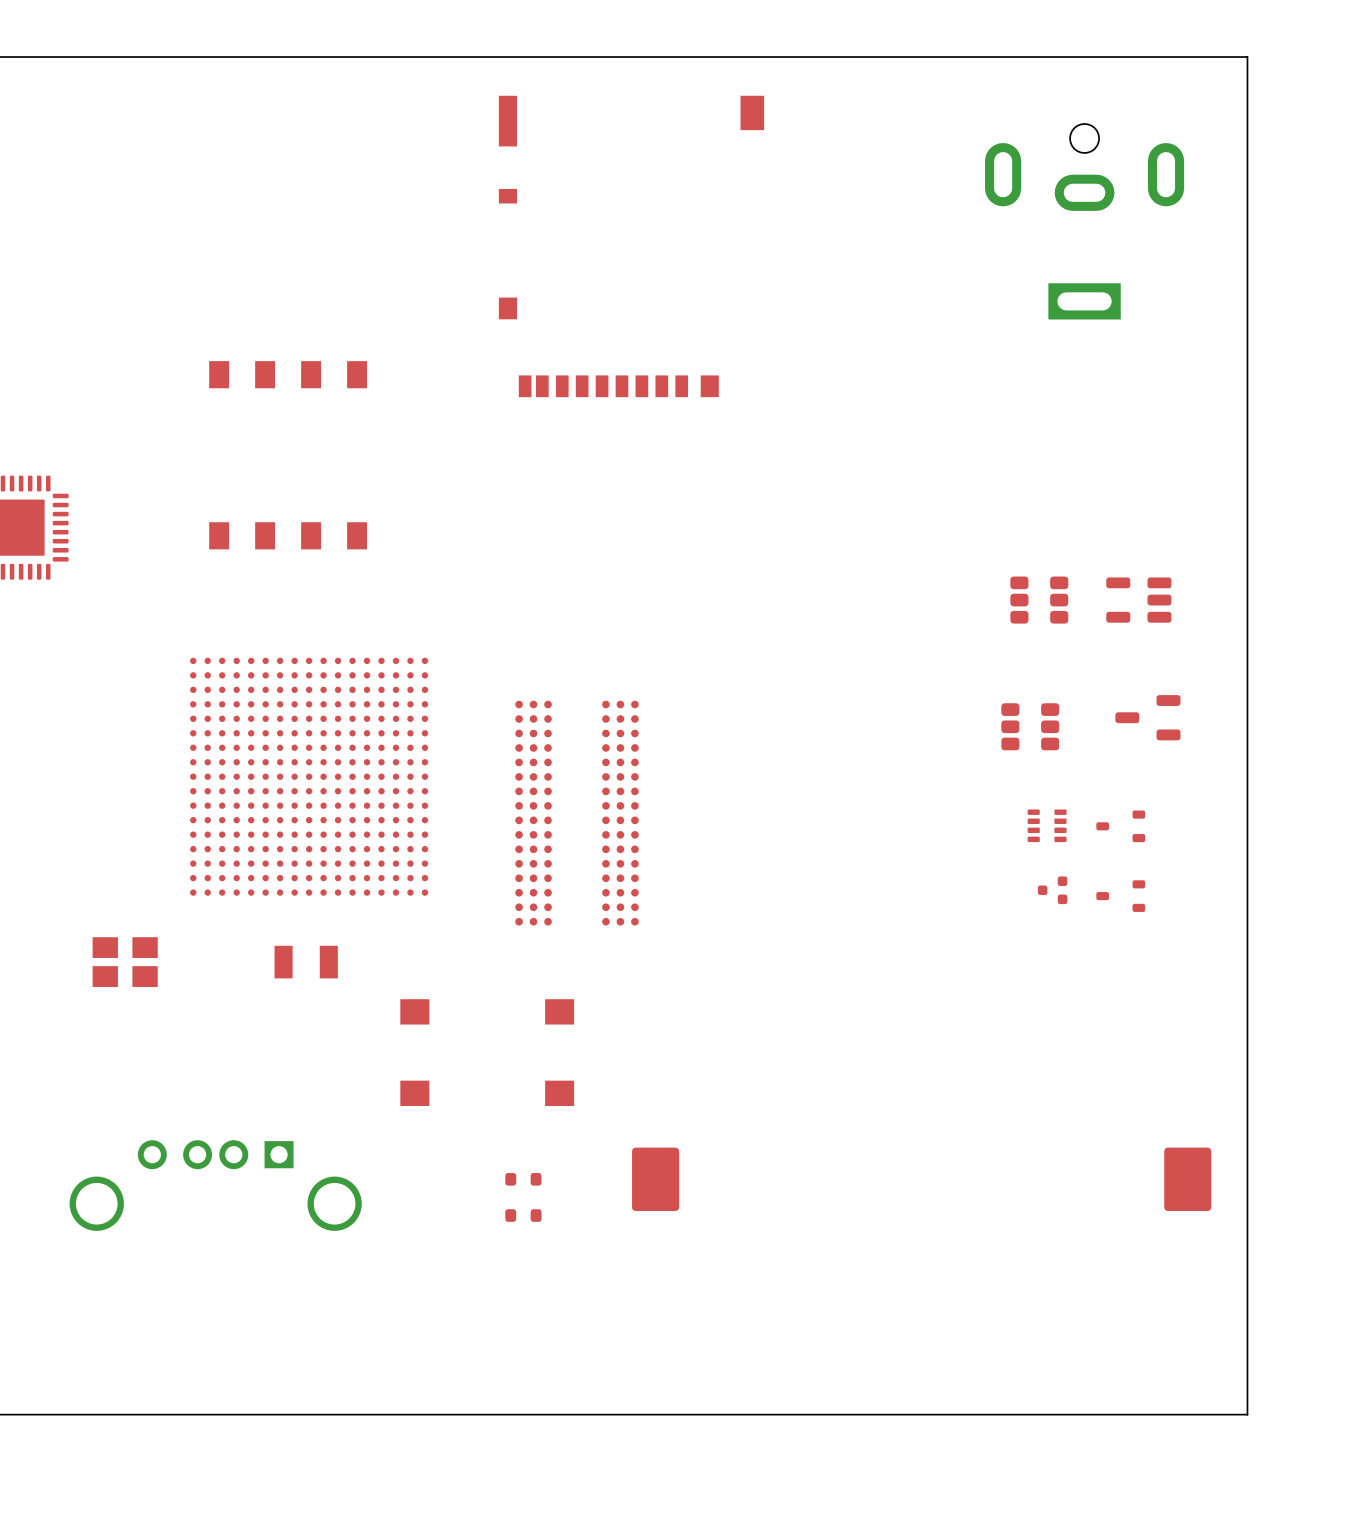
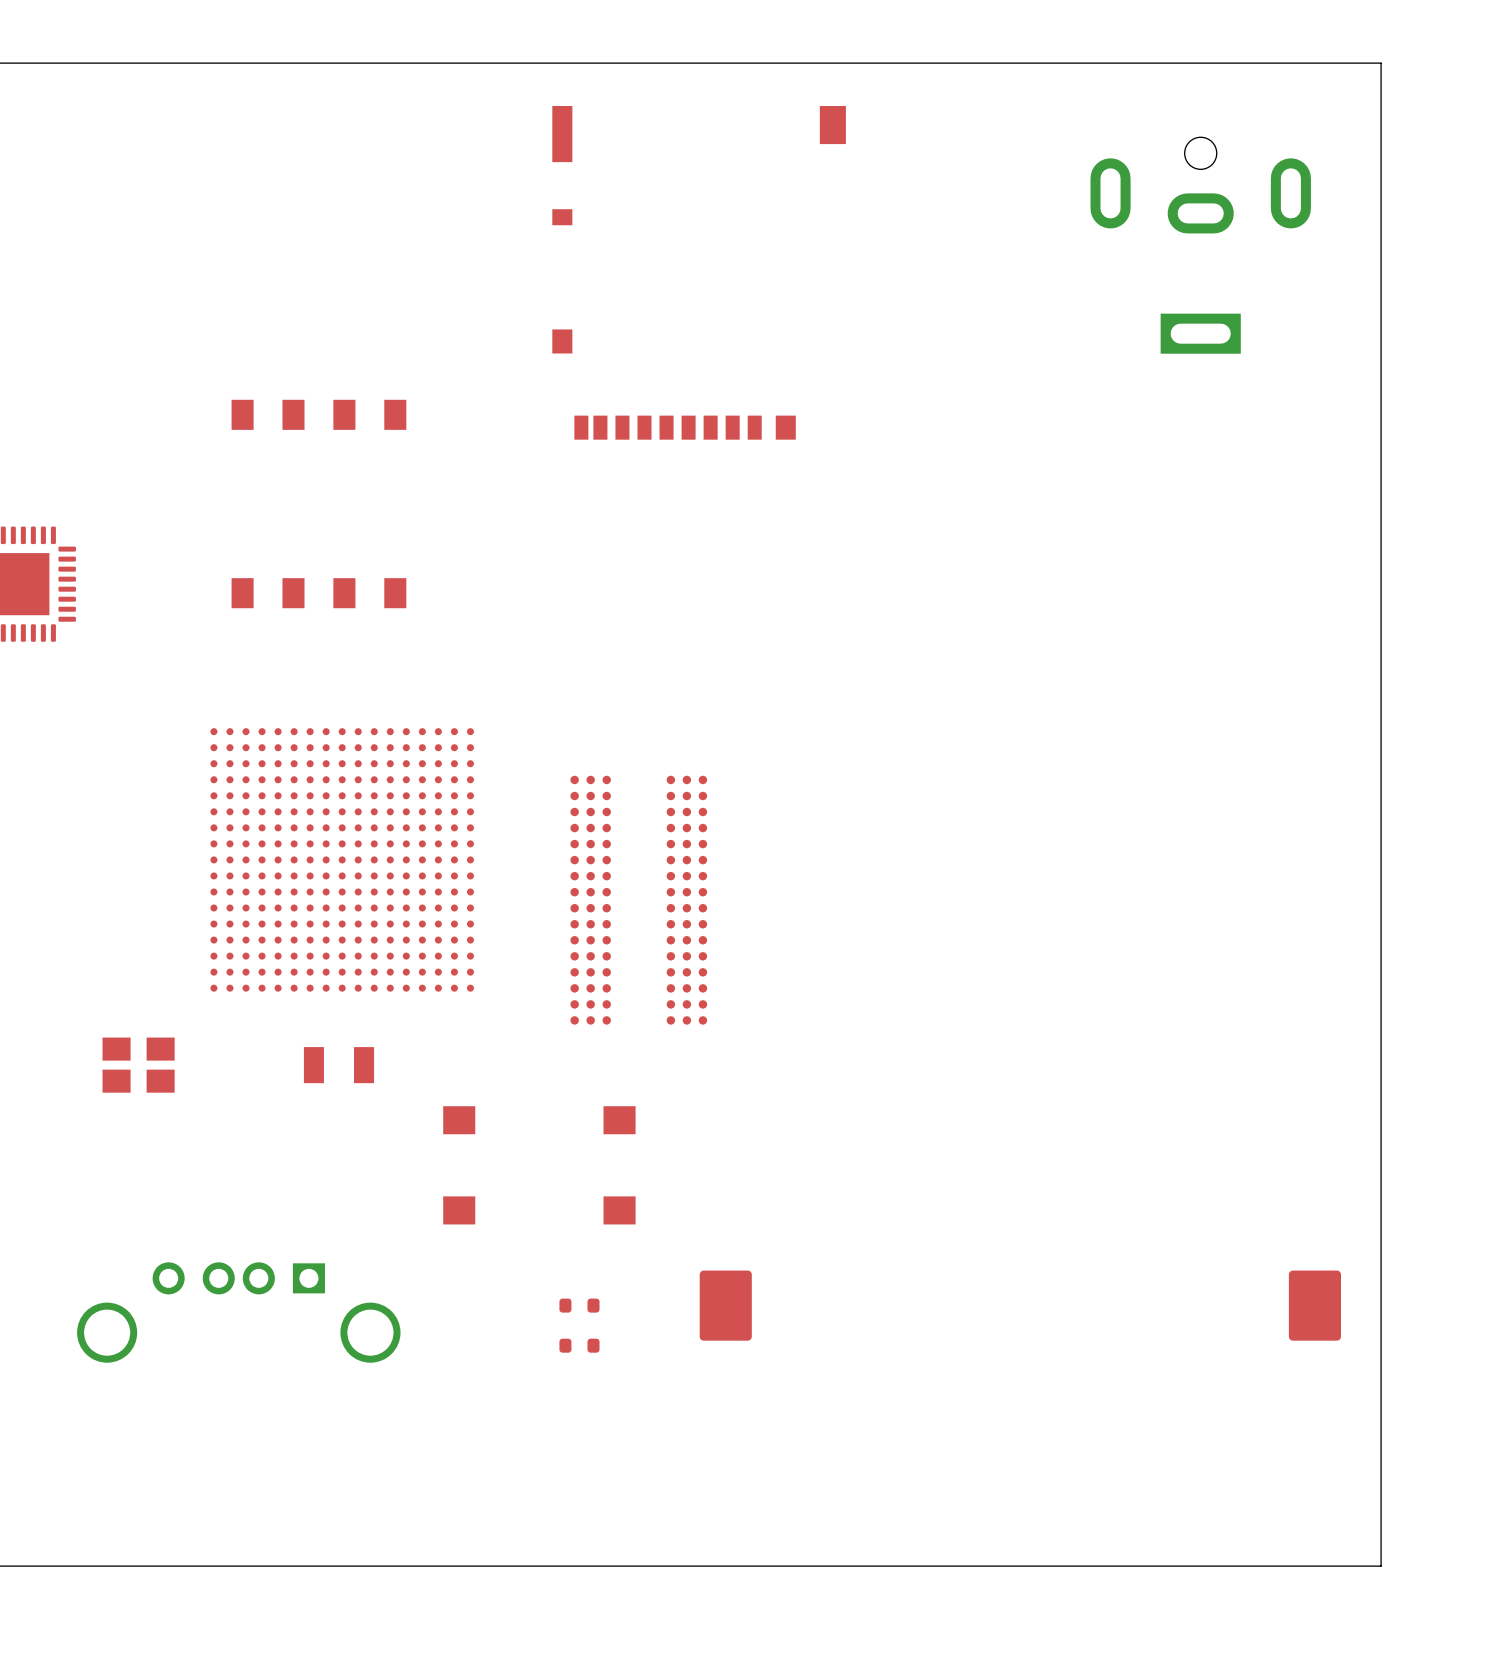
part: (1039, 600) -> none
part: (1138, 600) -> none
part: (1147, 717) -> none
part: (1030, 726) -> none
part: (1047, 825) -> none
part: (1120, 826) -> none
part: (1052, 890) -> none
part: (1120, 896) -> none

